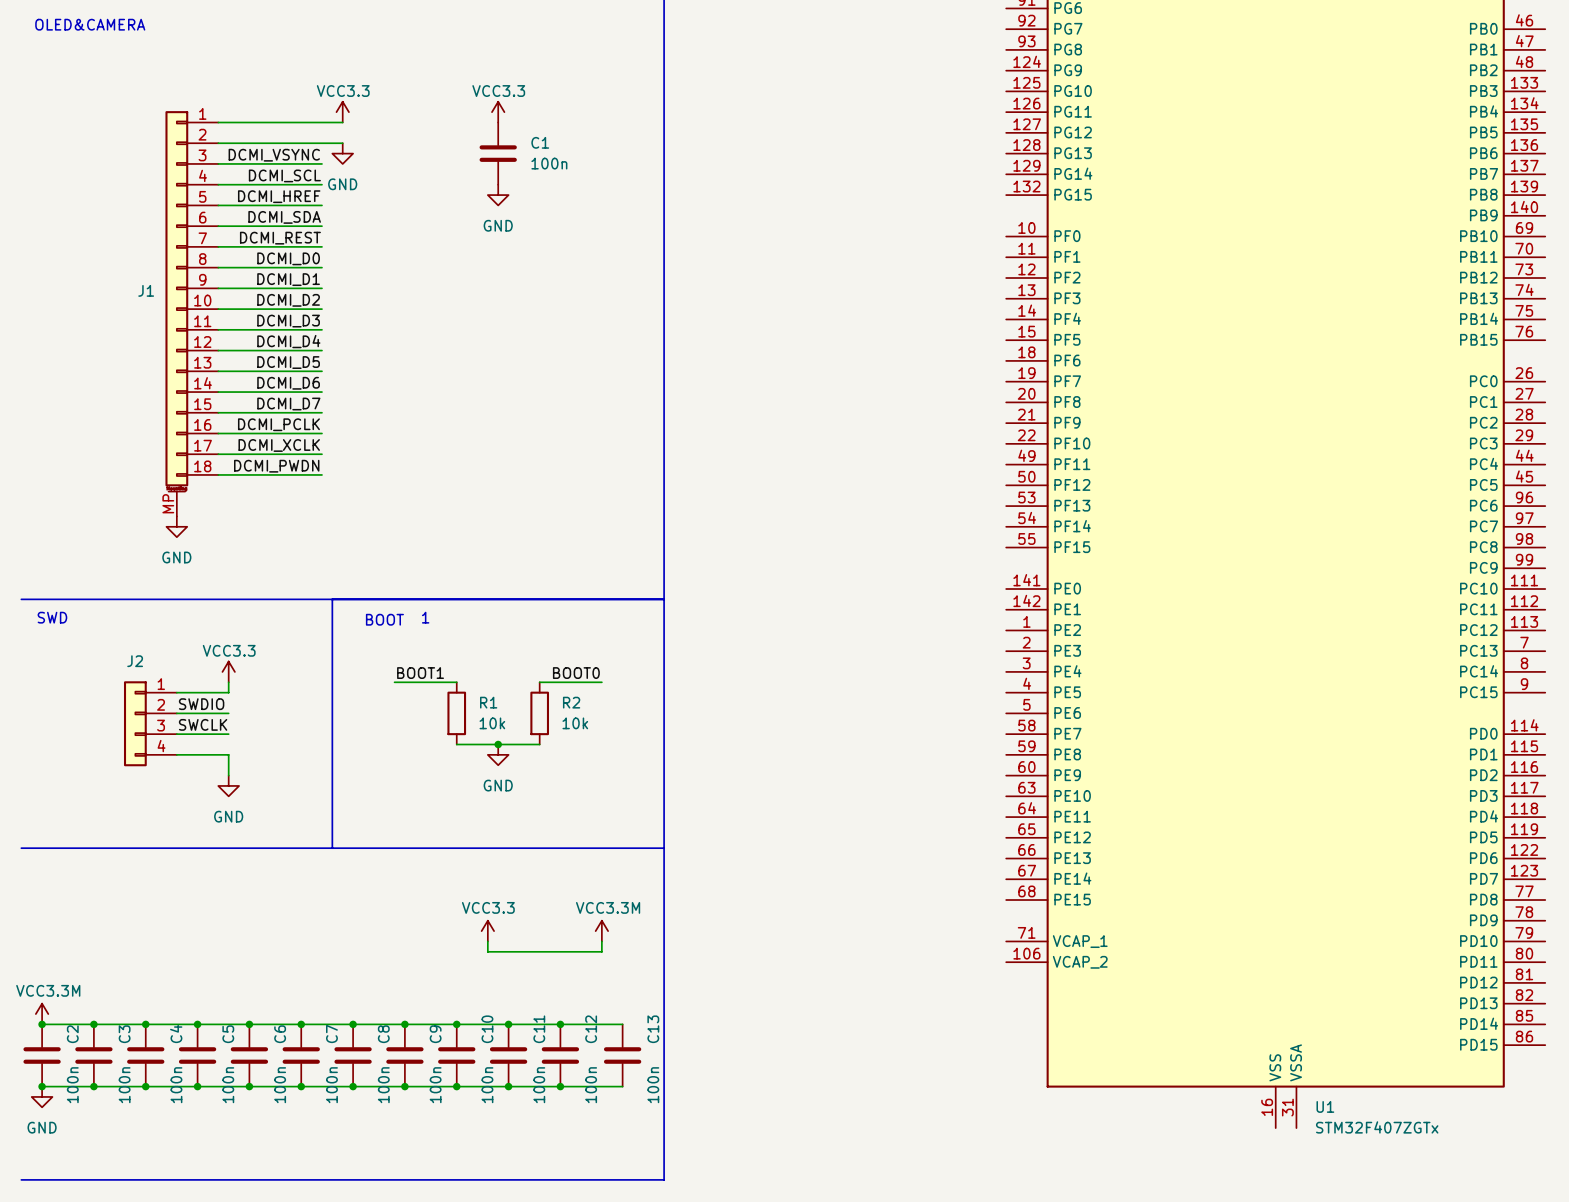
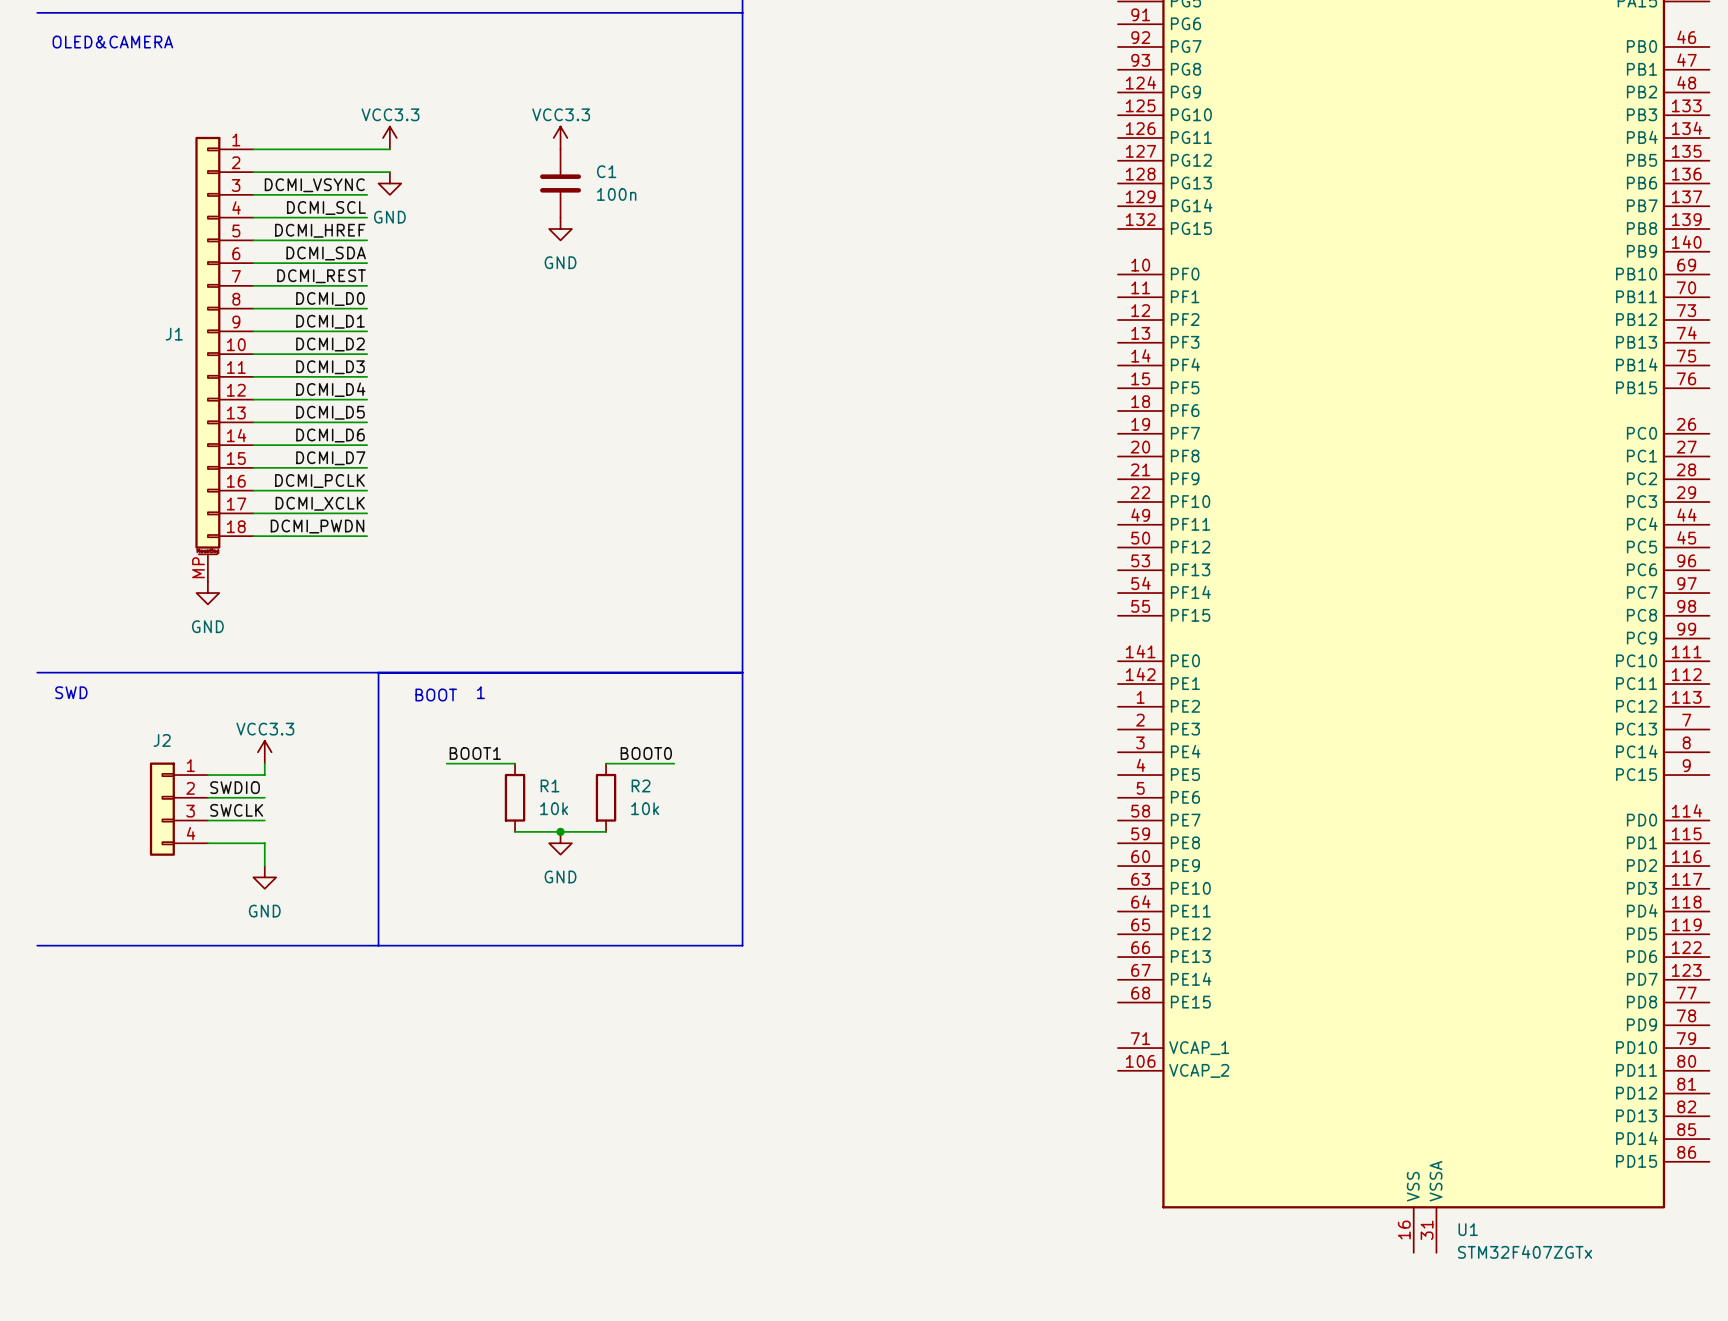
line: (664, 848) (664, 1179) (21, 1179) -> none
power symbol: VCC3.3 (487, 931) -> none
power symbol: VCC3.3M (601, 931) -> none
wire: (487, 941) (487, 951) (601, 951) (601, 941) -> none
power symbol: VCC3.3M (42, 1014) -> none
wire: (42, 1024) (622, 1024) -> none
junction: (42, 1024) -> none
junction: (93, 1024) -> none
junction: (145, 1024) -> none
junction: (197, 1024) -> none
junction: (249, 1024) -> none
junction: (301, 1024) -> none
junction: (353, 1024) -> none
junction: (404, 1024) -> none
junction: (456, 1024) -> none
junction: (508, 1024) -> none
junction: (560, 1024) -> none
C2: 100n (42, 1055) -> none
C3: 100n (93, 1055) -> none
C4: 100n (145, 1055) -> none
C5: 100n (197, 1055) -> none
C6: 100n (249, 1055) -> none
C7: 100n (301, 1055) -> none
C8: 100n (353, 1055) -> none
C9: 100n (404, 1055) -> none
C10: 100n (456, 1055) -> none
C11: 100n (508, 1055) -> none
C12: 100n (560, 1055) -> none
C13: 100n (622, 1055) -> none
wire: (42, 1086) (622, 1086) -> none
junction: (42, 1086) -> none
junction: (93, 1086) -> none
junction: (145, 1086) -> none
junction: (197, 1086) -> none
junction: (249, 1086) -> none
junction: (301, 1086) -> none
junction: (353, 1086) -> none
junction: (404, 1086) -> none
junction: (456, 1086) -> none
junction: (508, 1086) -> none
junction: (560, 1086) -> none
power symbol: GND (42, 1096) -> none

